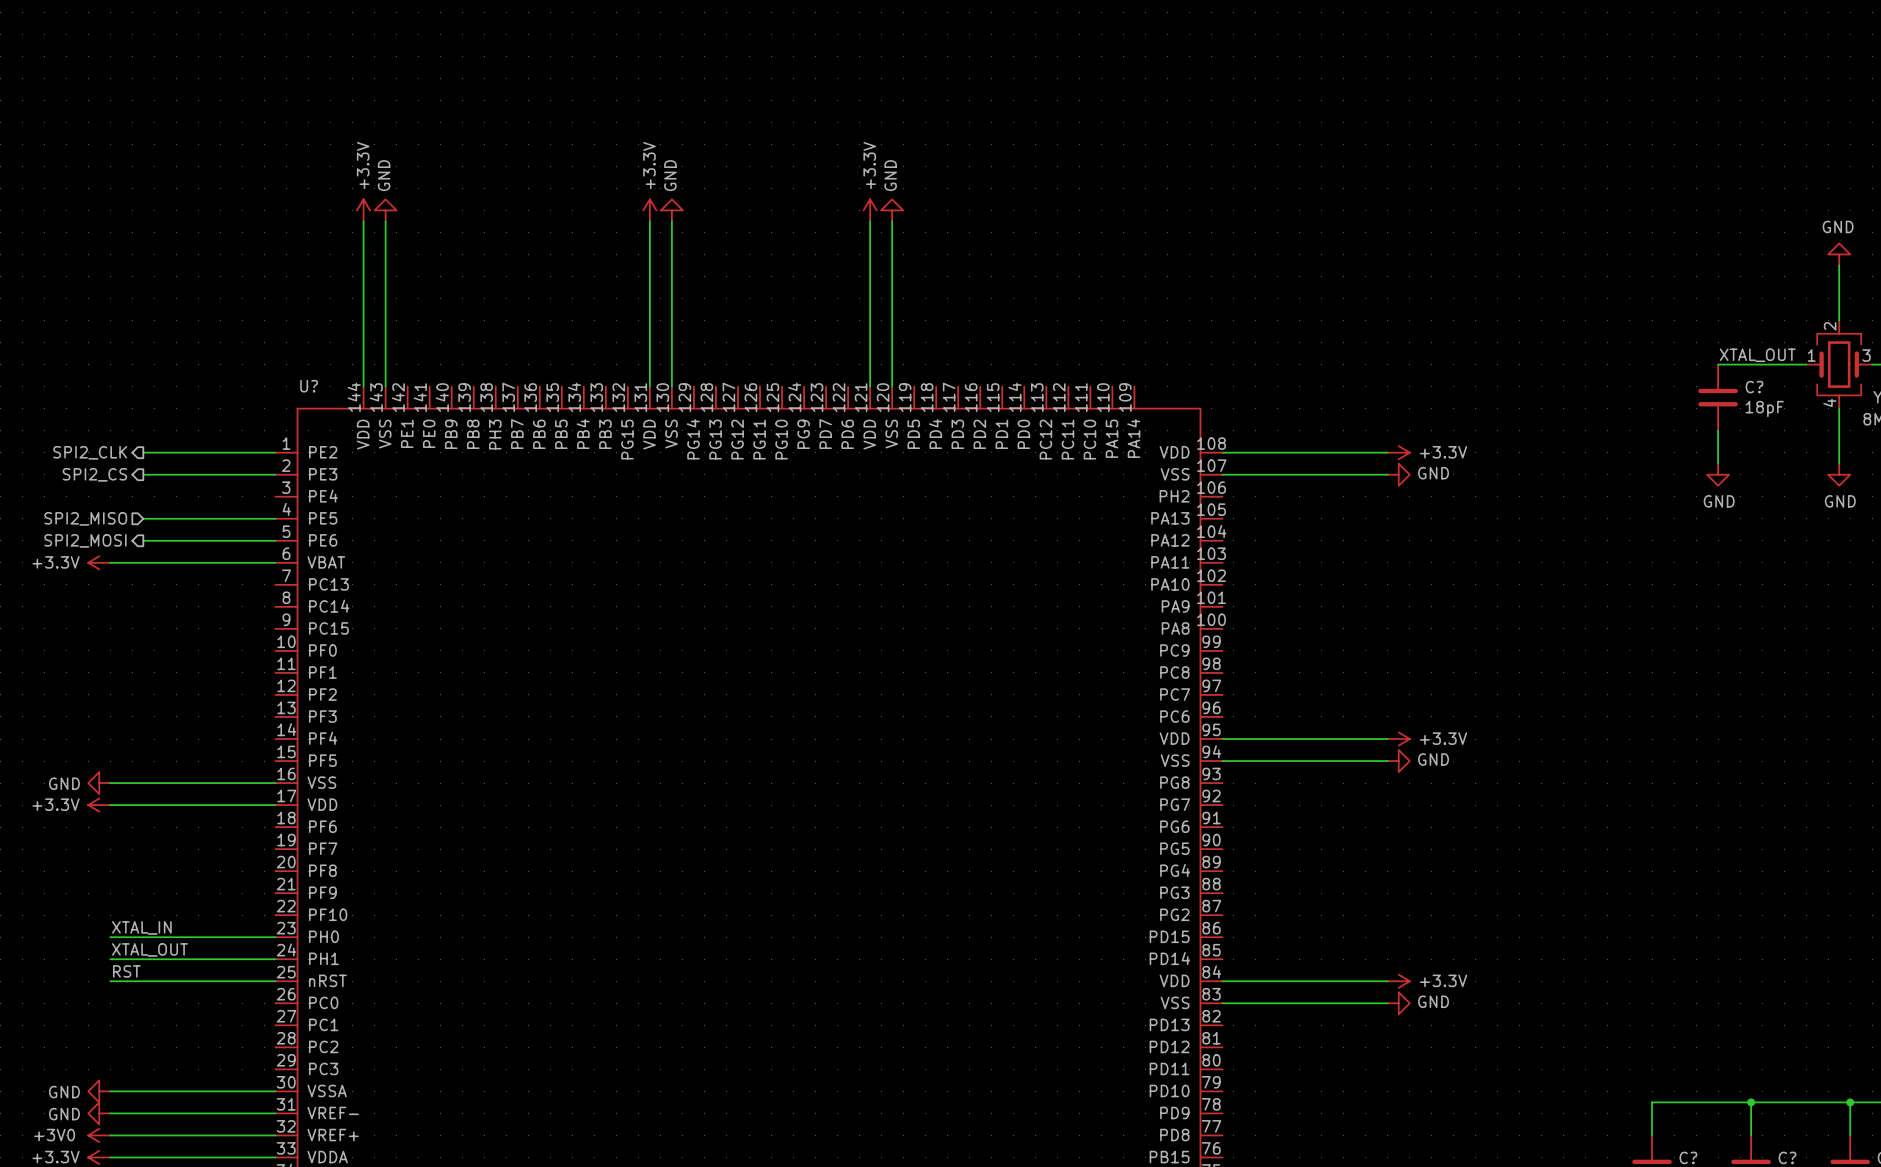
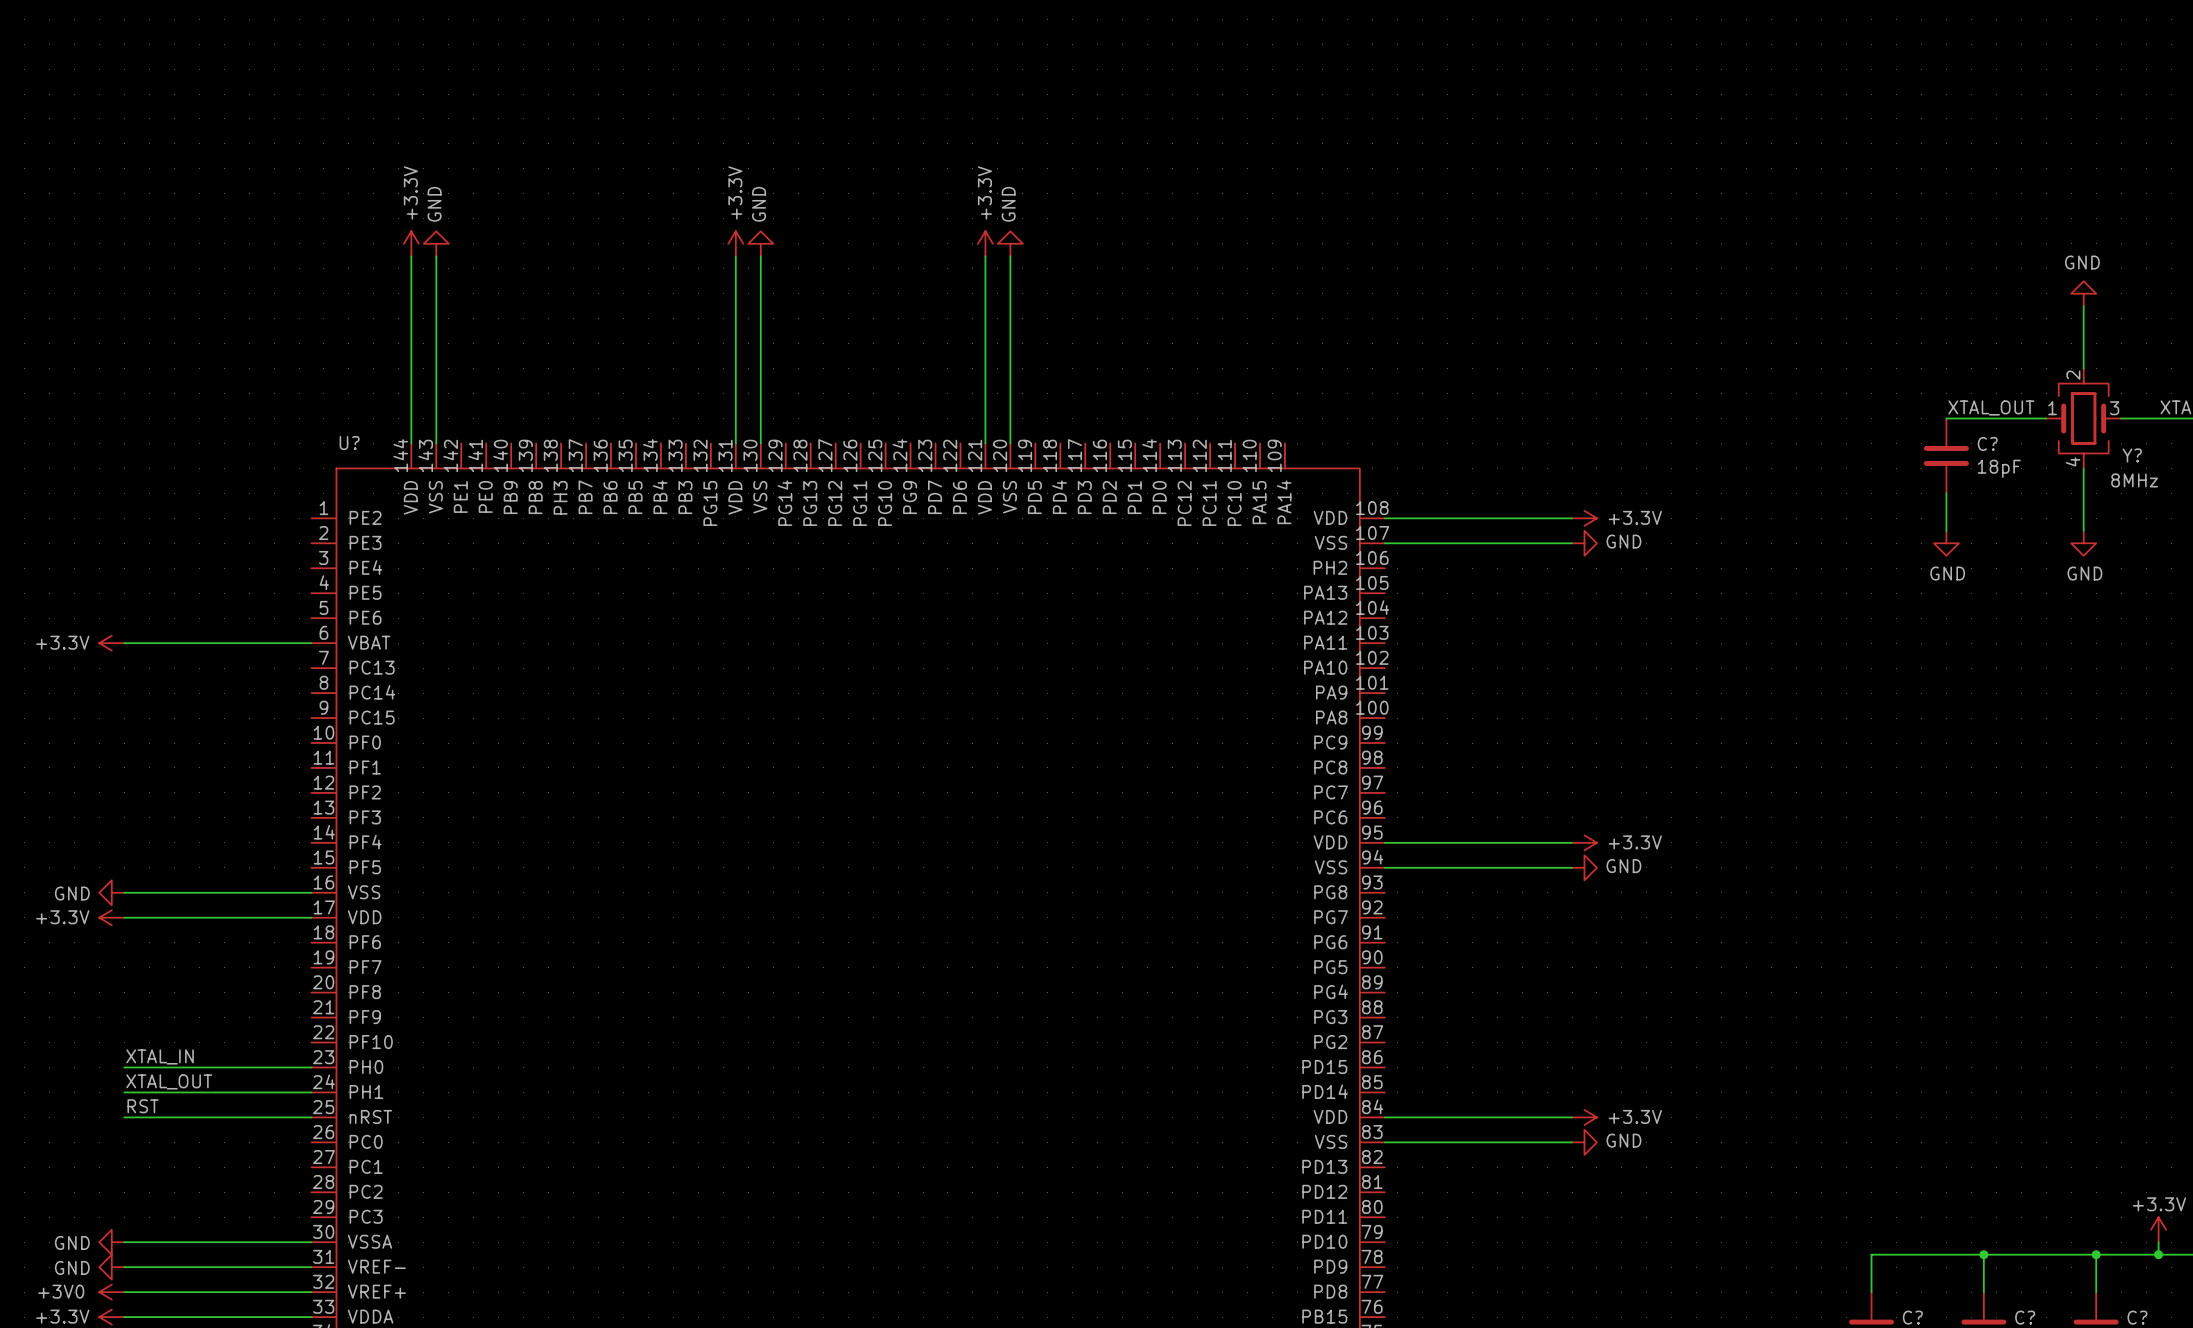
hierarchical label: SPI2_CLK (90, 452) -> none
wire: (143, 452) (275, 452) -> none
hierarchical label: SPI2_CS (94, 474) -> none
wire: (143, 474) (275, 474) -> none
hierarchical label: SPI2_MISO (85, 518) -> none
wire: (143, 518) (275, 518) -> none
hierarchical label: SPI2_MOSI (85, 540) -> none
wire: (143, 540) (275, 540) -> none

